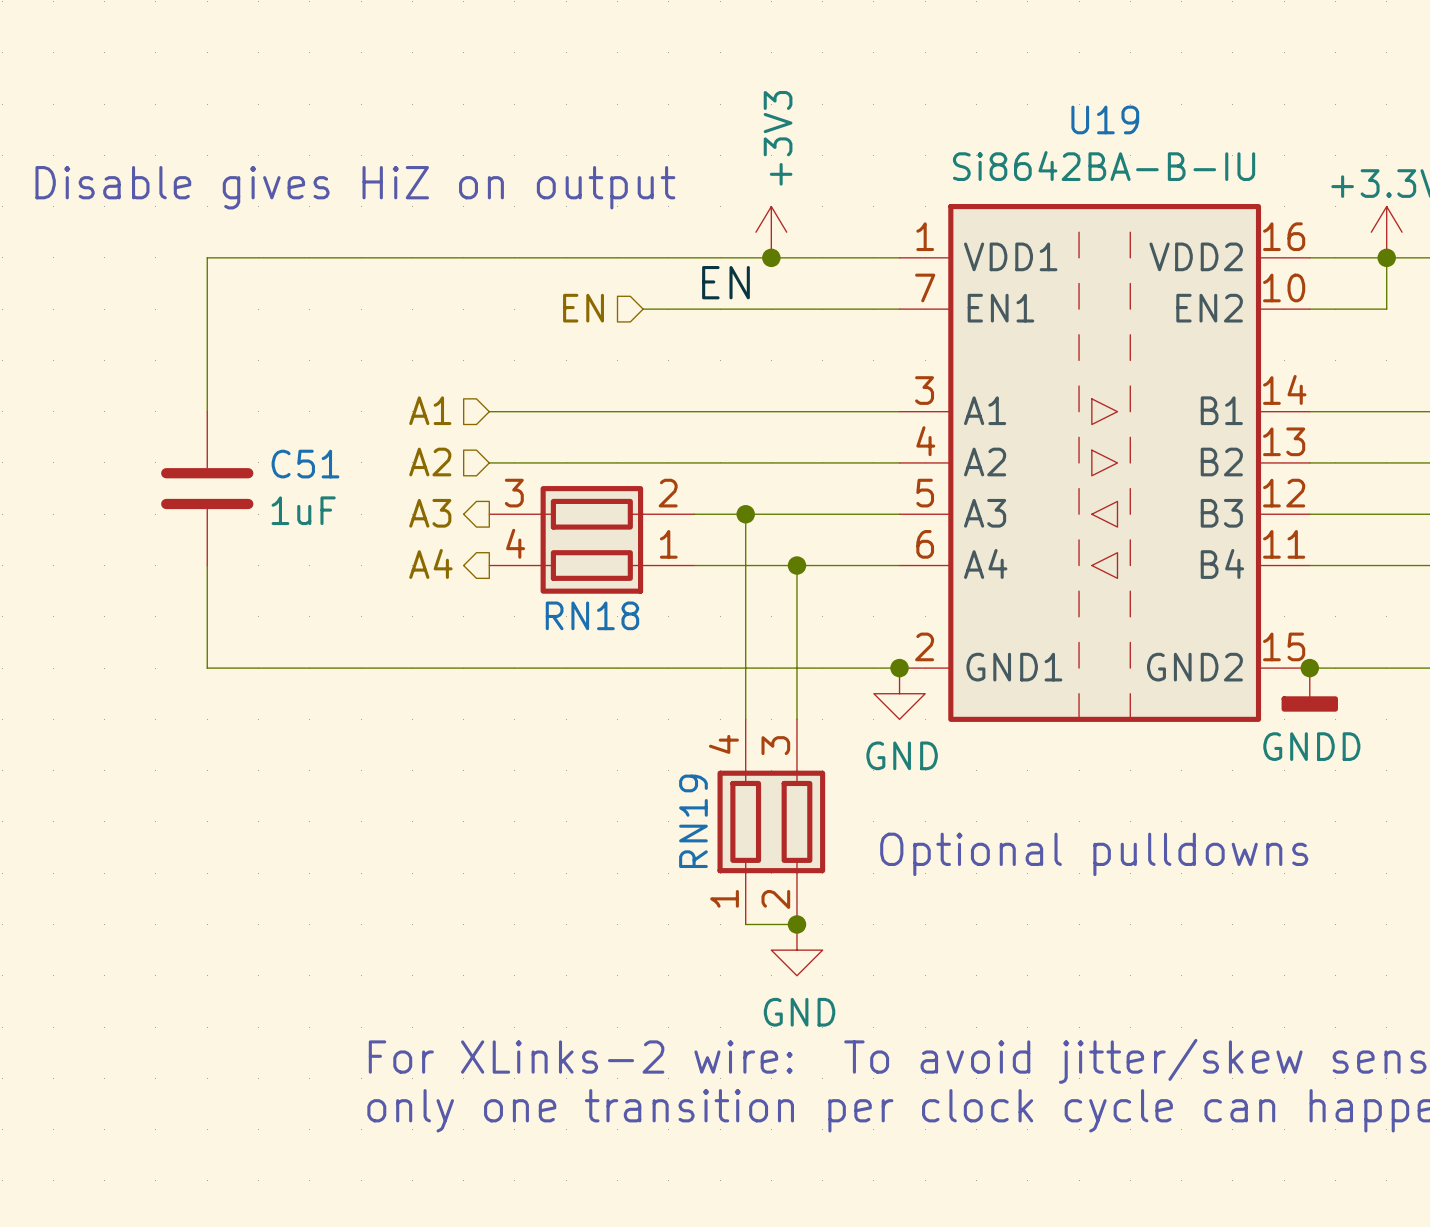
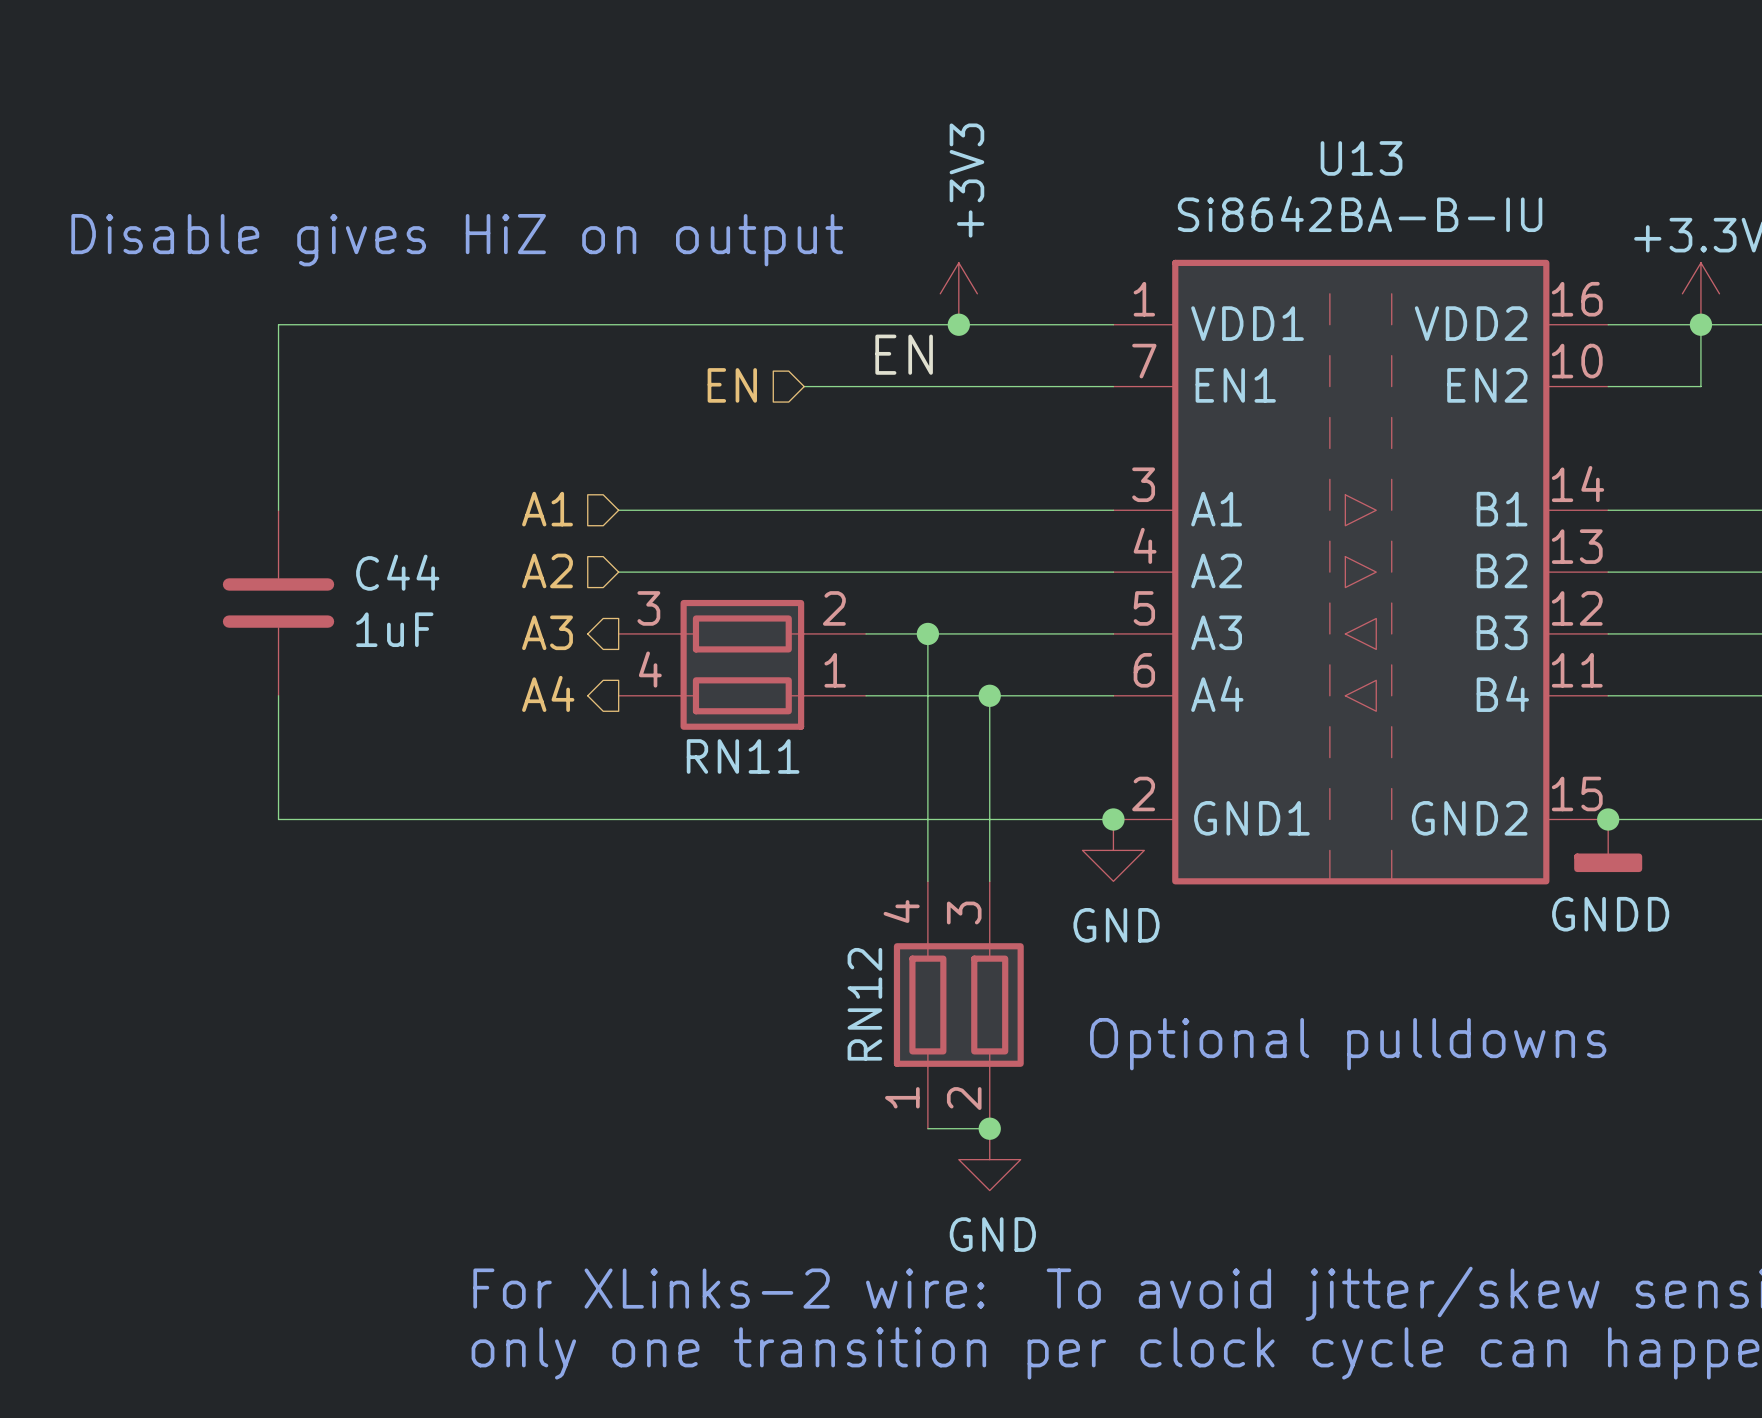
U19 name: U19 (1105, 119) -> U13 (1361, 158)
C51 name: C51 (305, 464) -> C44 (397, 572)
RN18 name: RN18 (592, 615) -> RN11 (743, 756)
RN19 name: RN19 (693, 821) -> RN12 (864, 1004)

